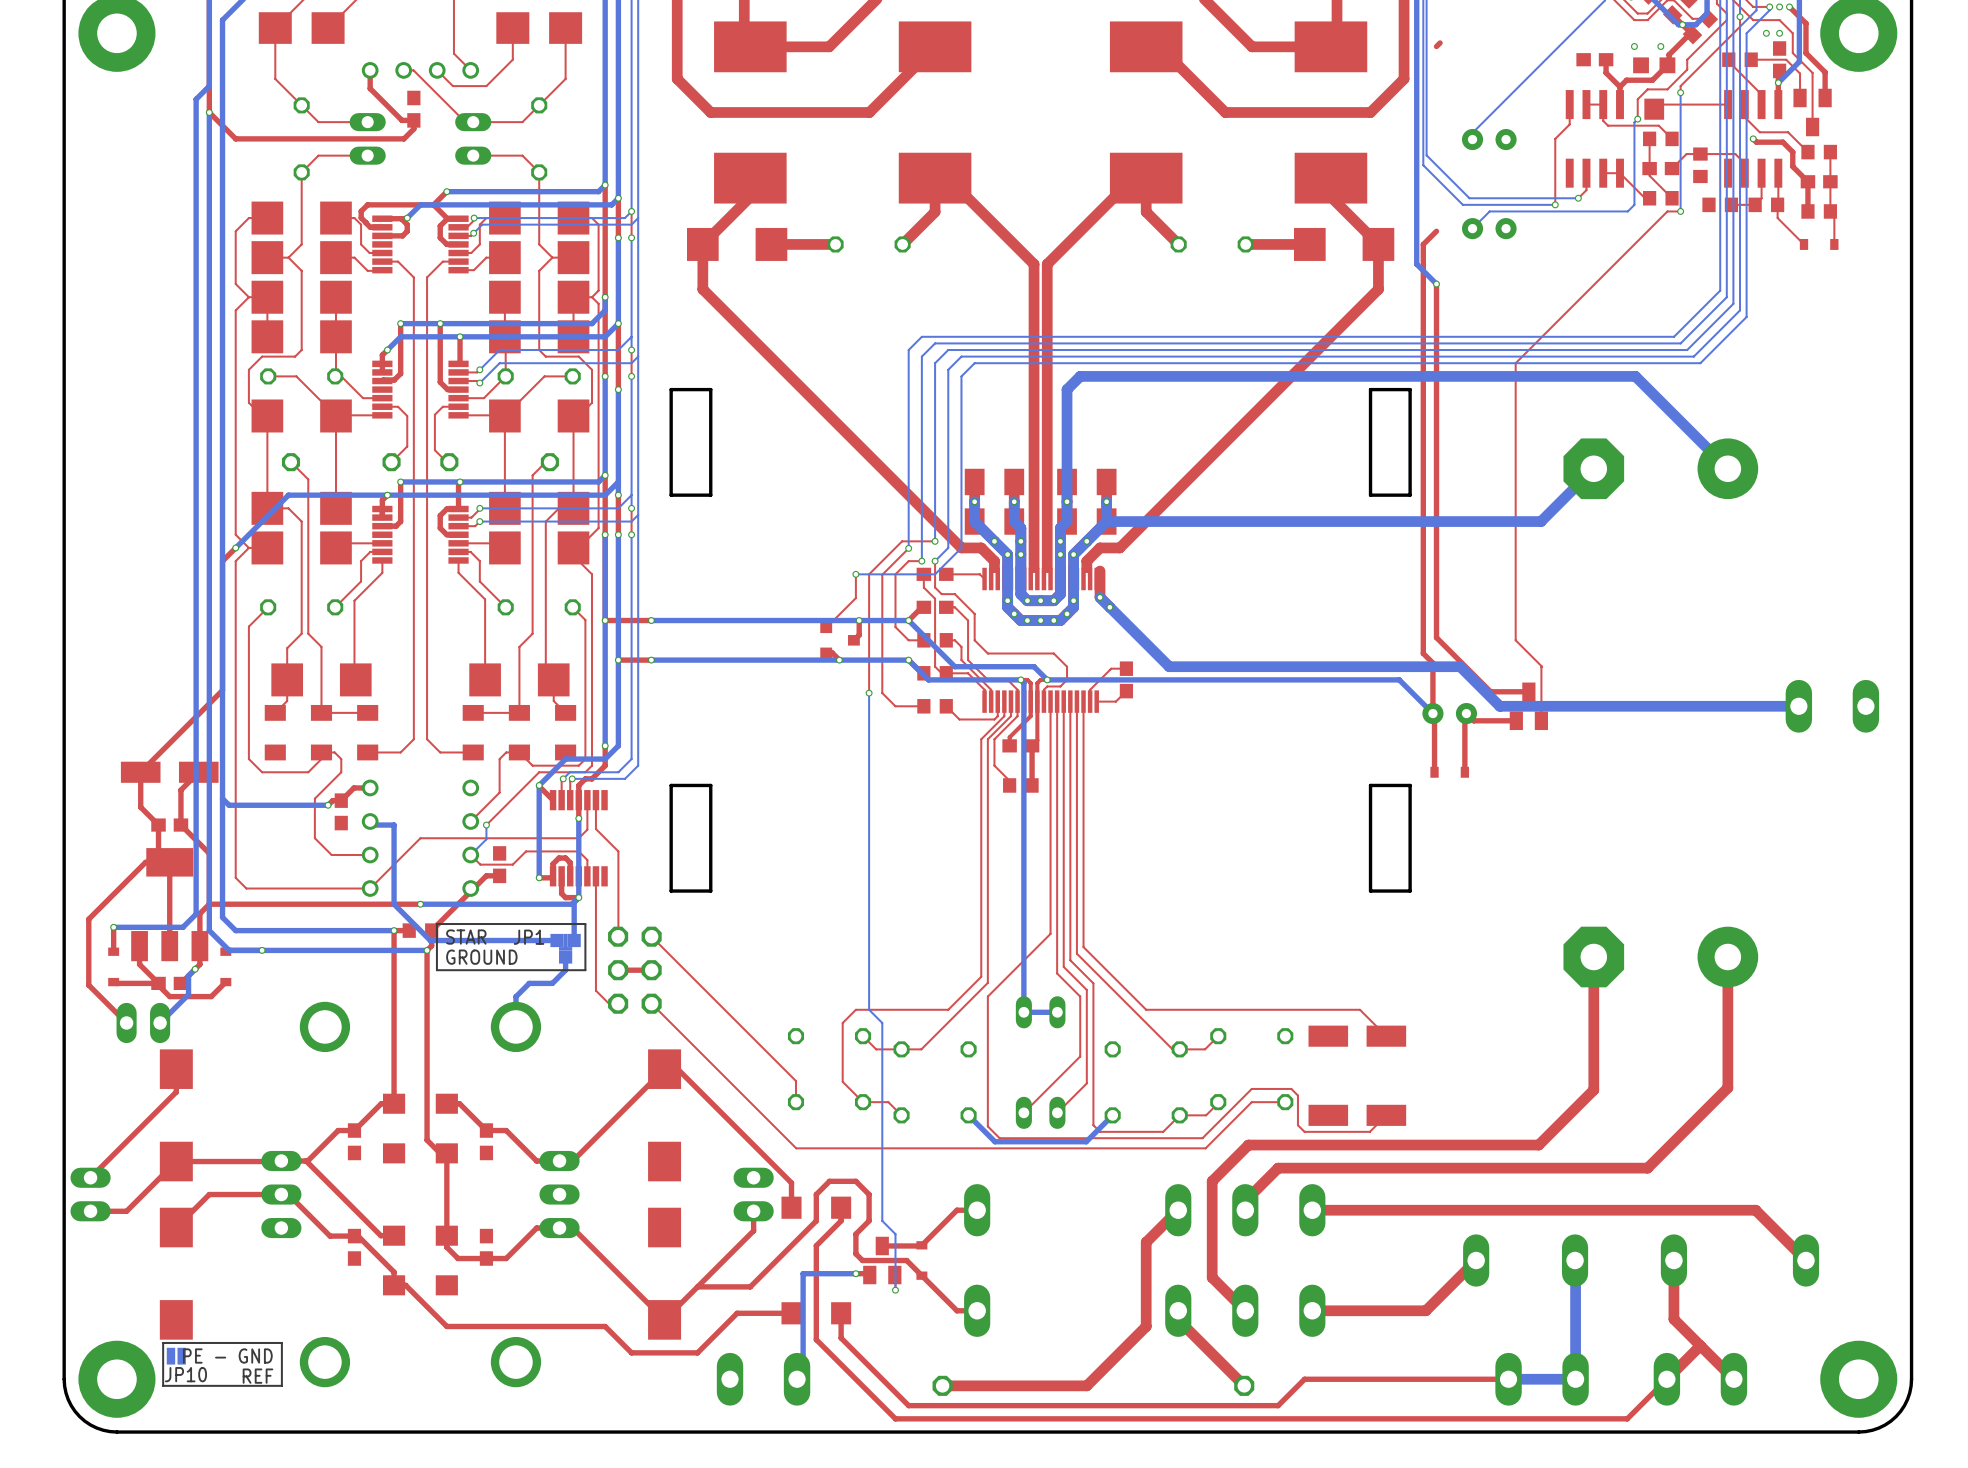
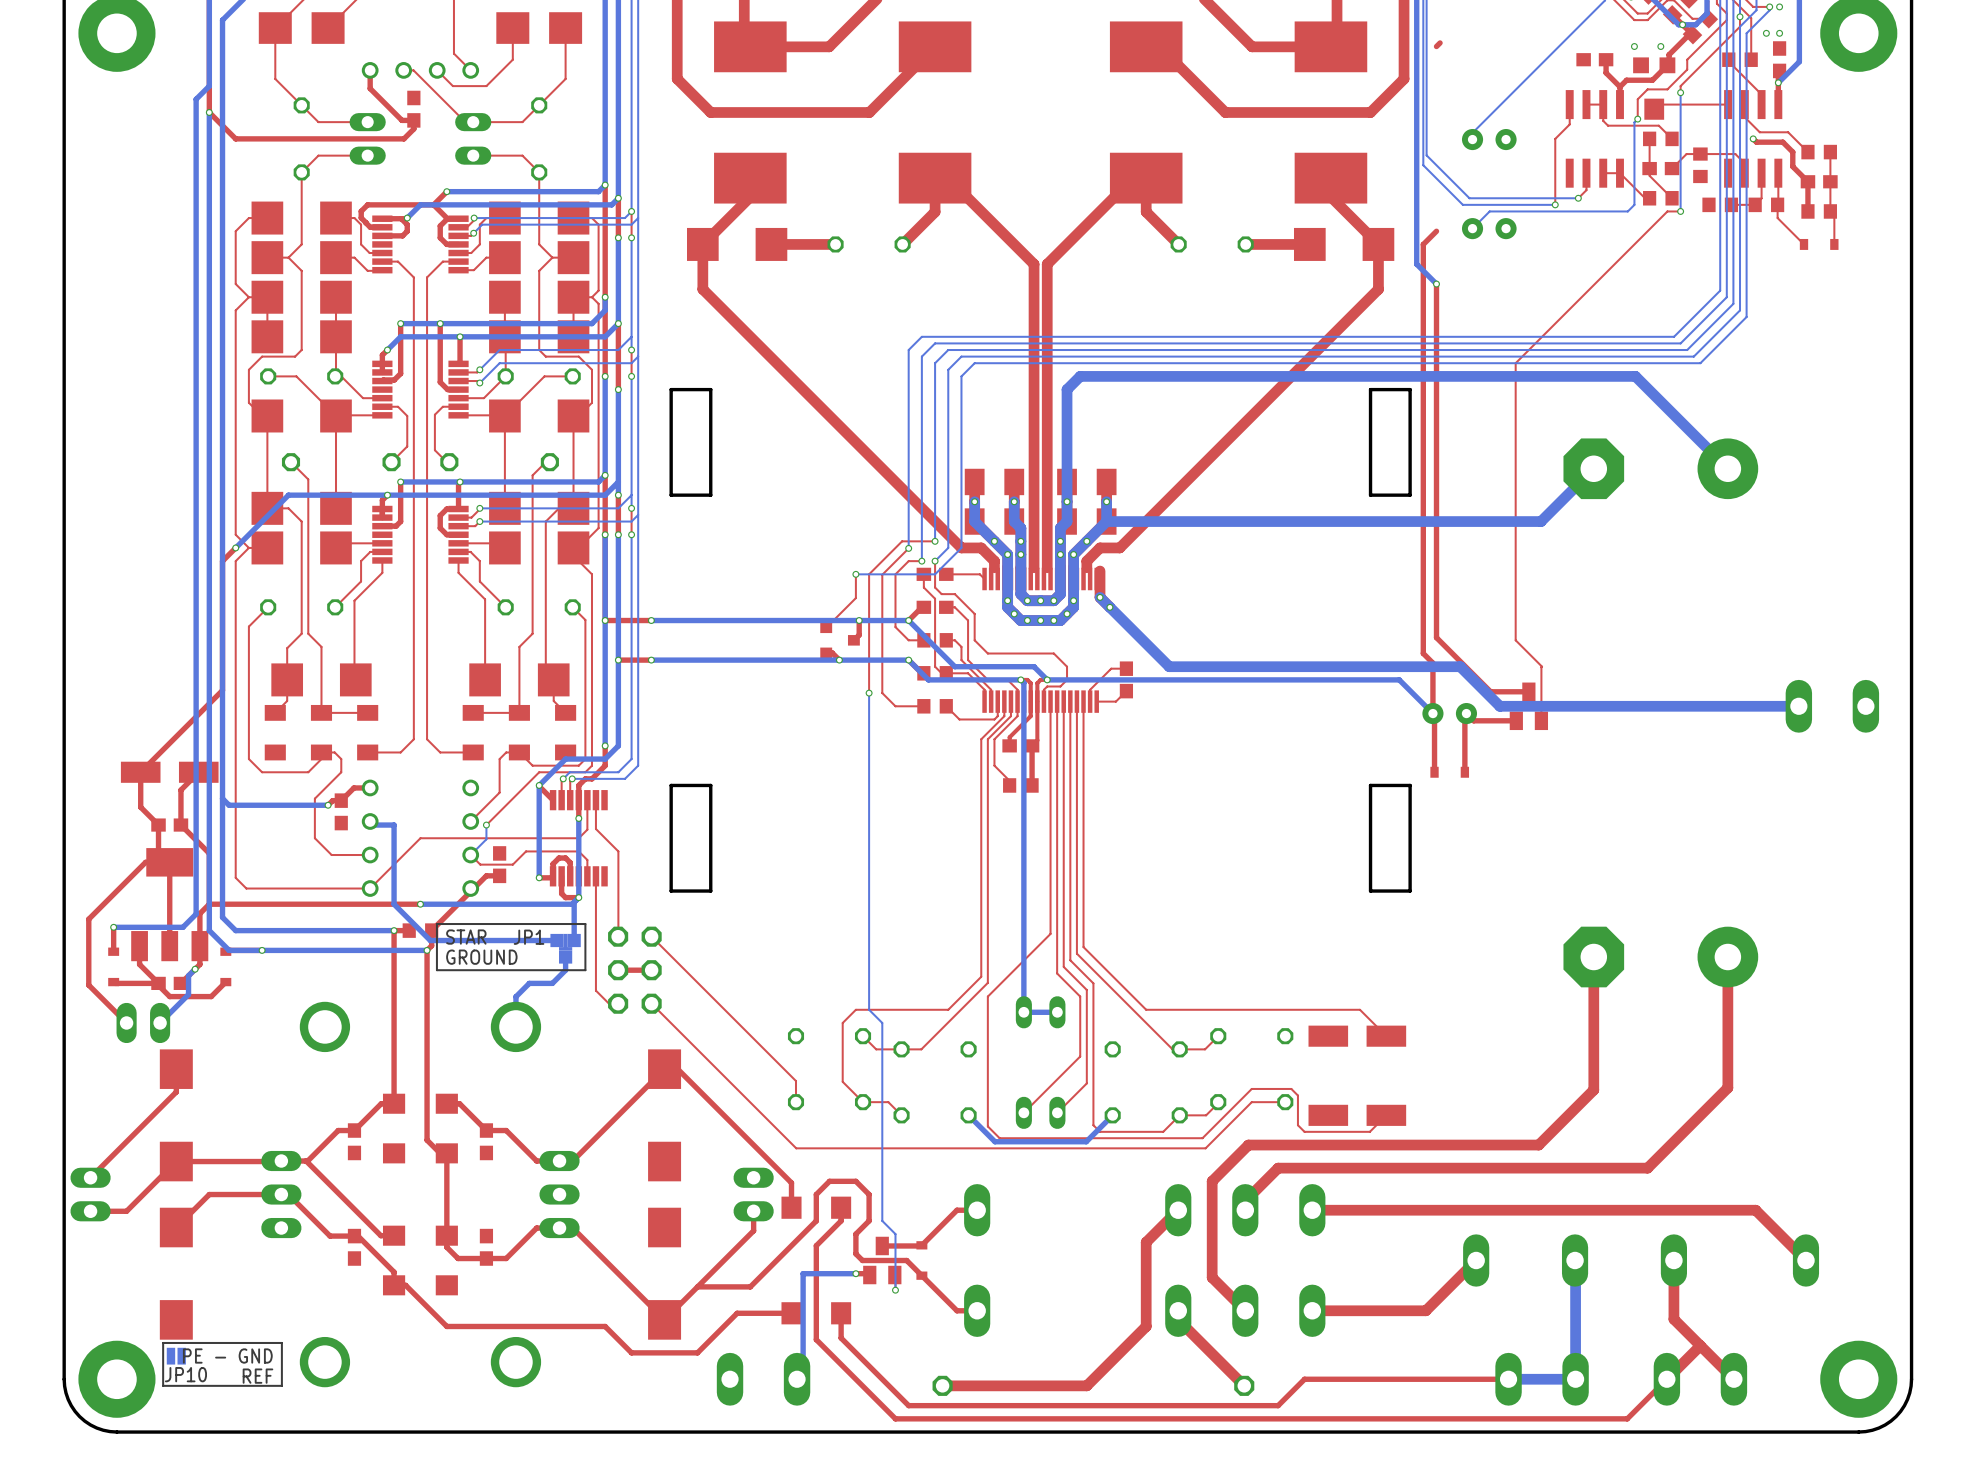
top track: (1789, 6) (1805, 23) (1805, 53) (1825, 72) (1825, 97) -> none
via: (1789, 6) -> none
top track: (1751, 18) (1753, 20) (1779, 20) (1792, 33) (1792, 53) (1812, 72) (1812, 127) -> (1751, 18) (1751, 59)
top track: (1751, 59) (1786, 59) (1800, 73) (1800, 97) -> none
part: (1812, 112) -> none

